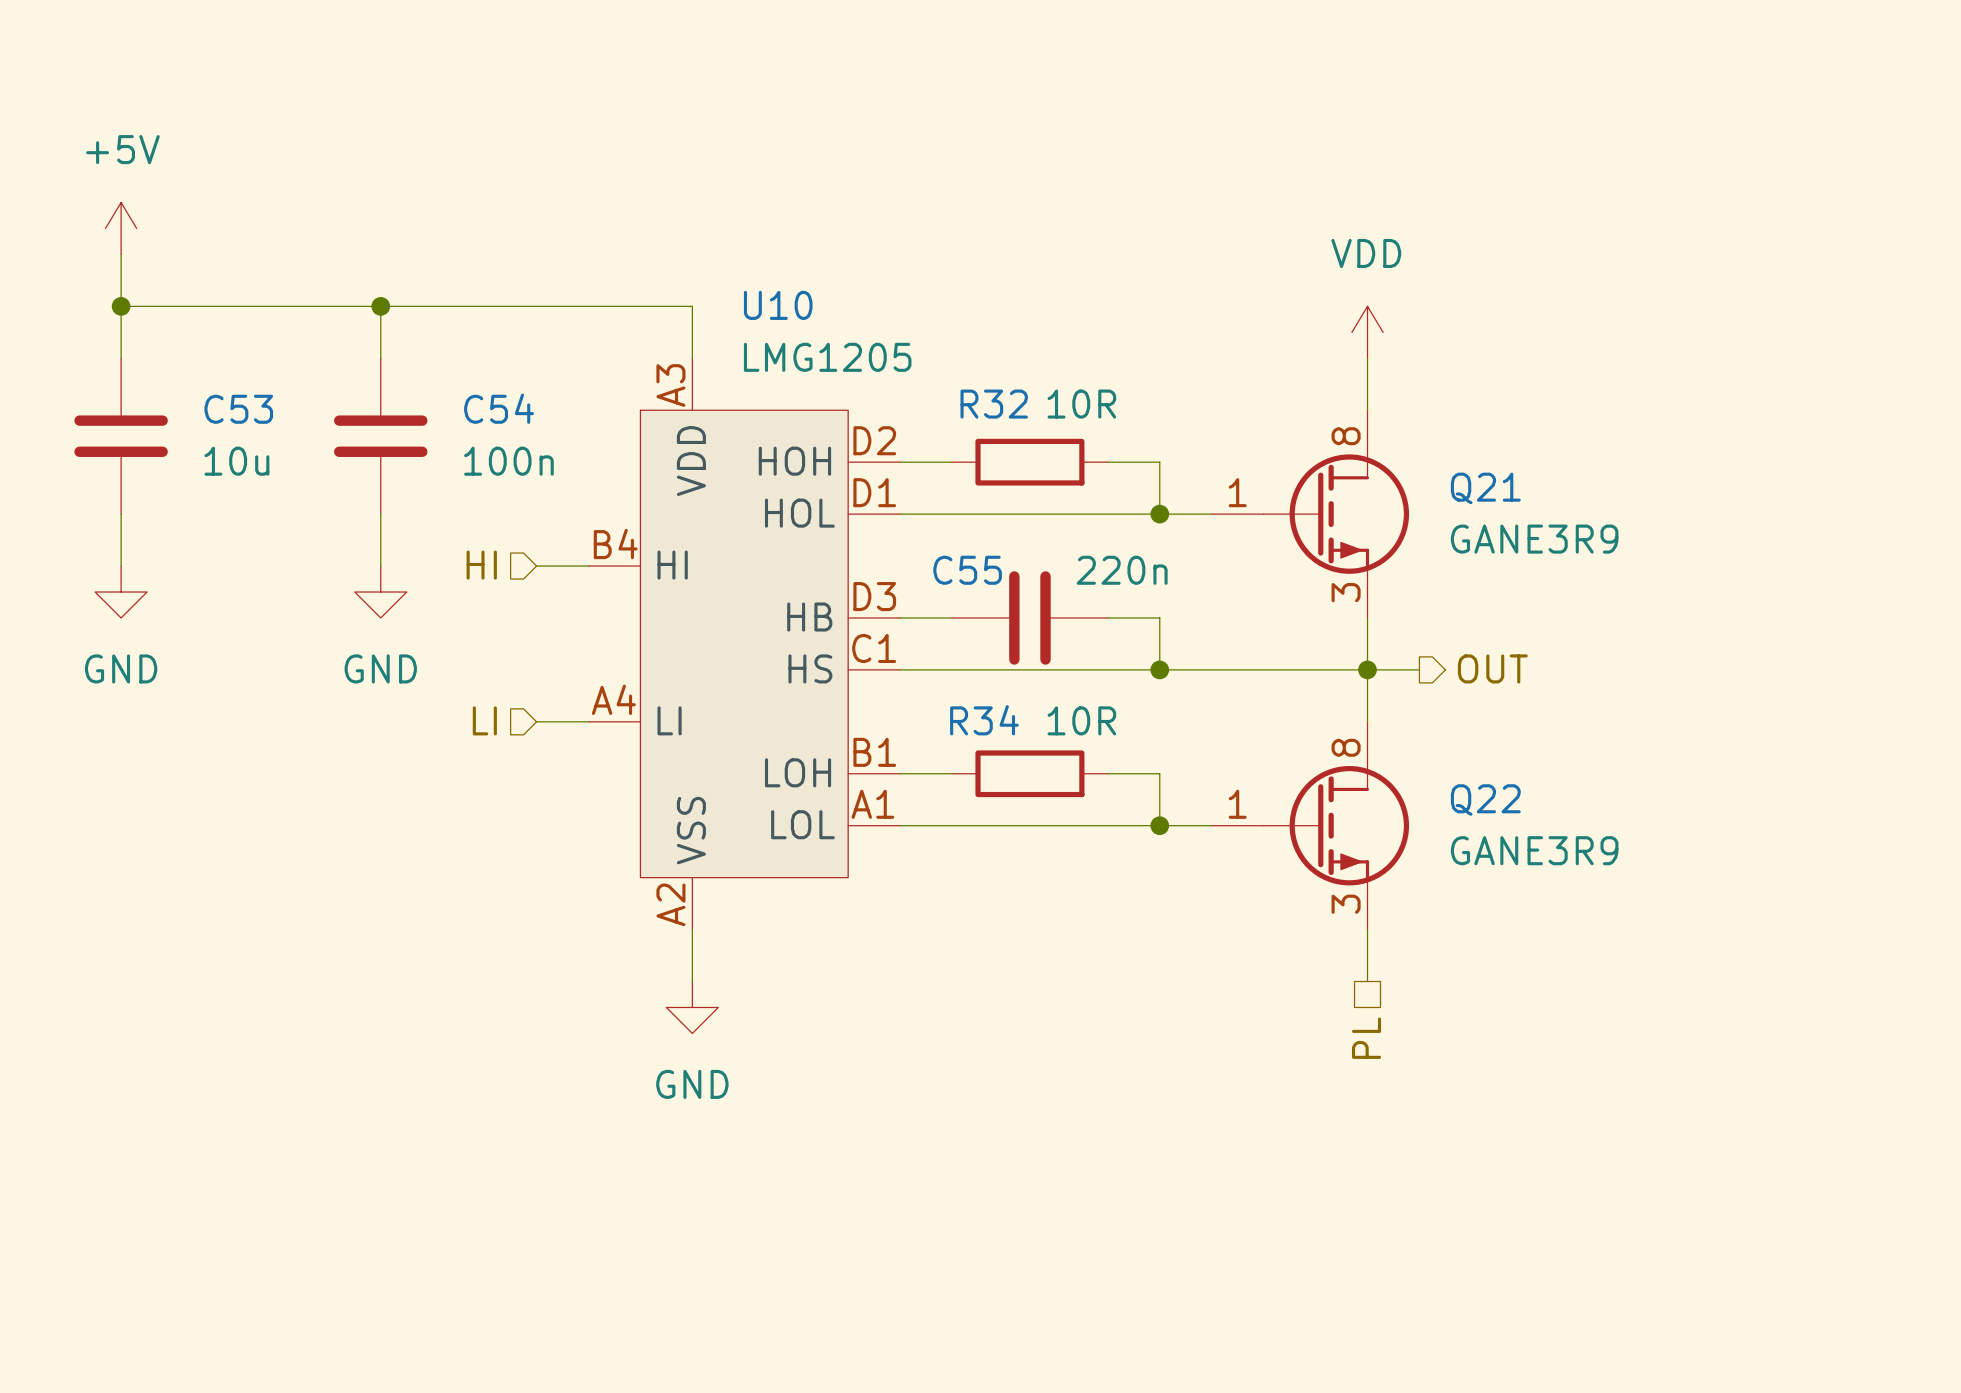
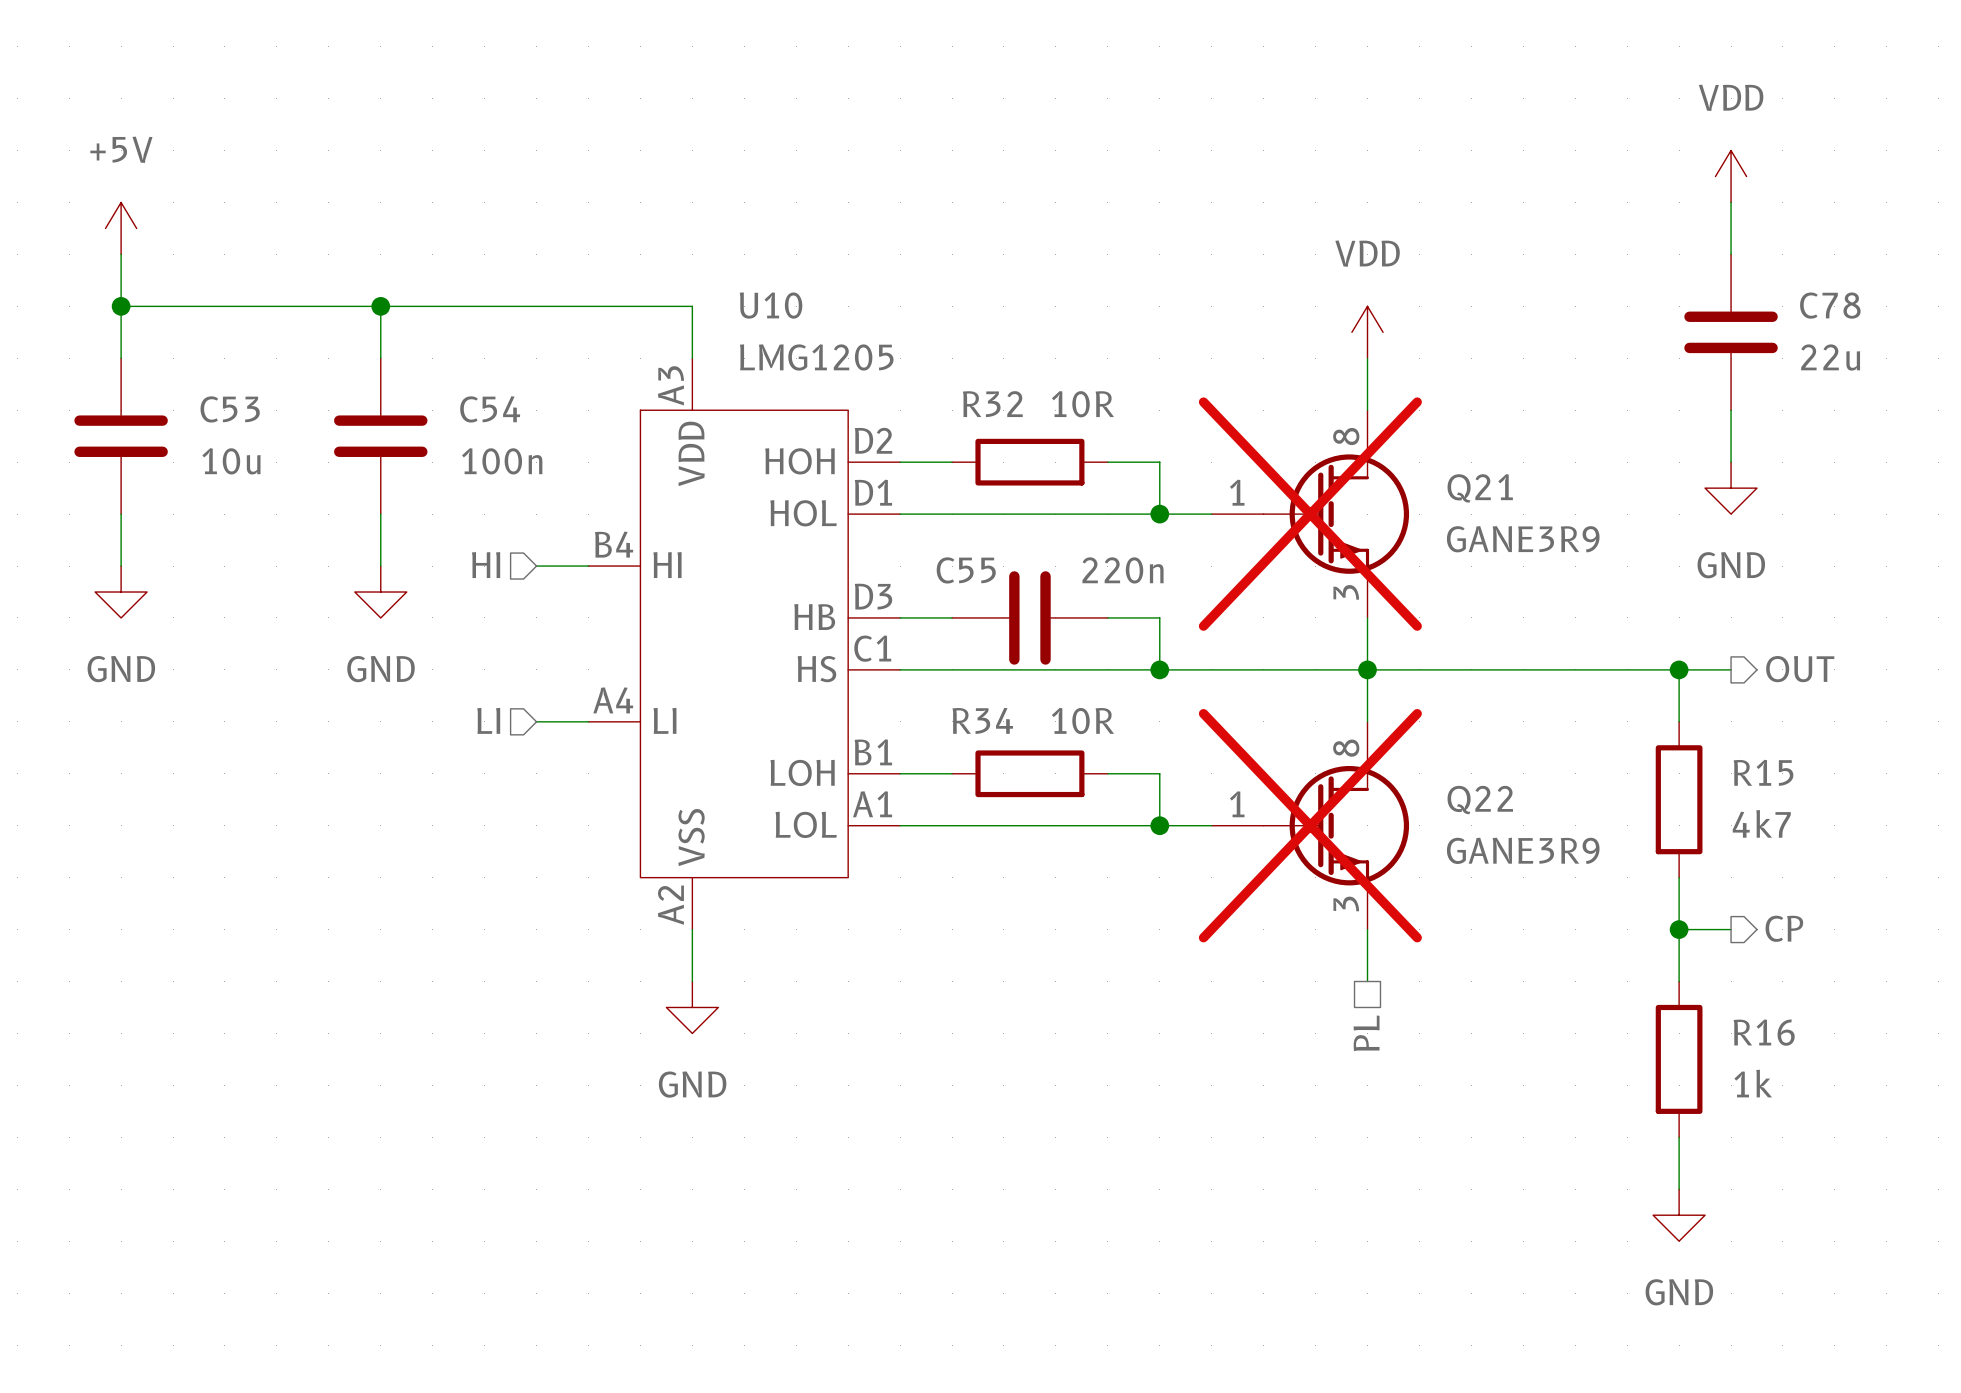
power symbol: none -> VDD (1731, 176)
wire: none -> (1731, 202) (1731, 254)
C78: none -> 22u (1731, 332)
wire: none -> (1731, 410) (1731, 462)
power symbol: none -> GND (1731, 488)
Q21 do-not-place cross: none -> (1310, 514)
hierarchical label position: OUT (1492, 668) -> OUT (1800, 669)
wire: none -> (1419, 669) (1731, 669)
wire: none -> (1679, 669) (1679, 721)
junction: none -> (1679, 669)
R15: none -> 4k7 (1679, 799)
Q22 do-not-place cross: none -> (1310, 825)
wire: none -> (1679, 877) (1679, 981)
hierarchical label: none -> CP (1784, 928)
wire: none -> (1679, 929) (1731, 929)
junction: none -> (1679, 929)
R16: none -> 1k (1679, 1059)
wire: none -> (1679, 1137) (1679, 1189)
power symbol: none -> GND (1679, 1215)

